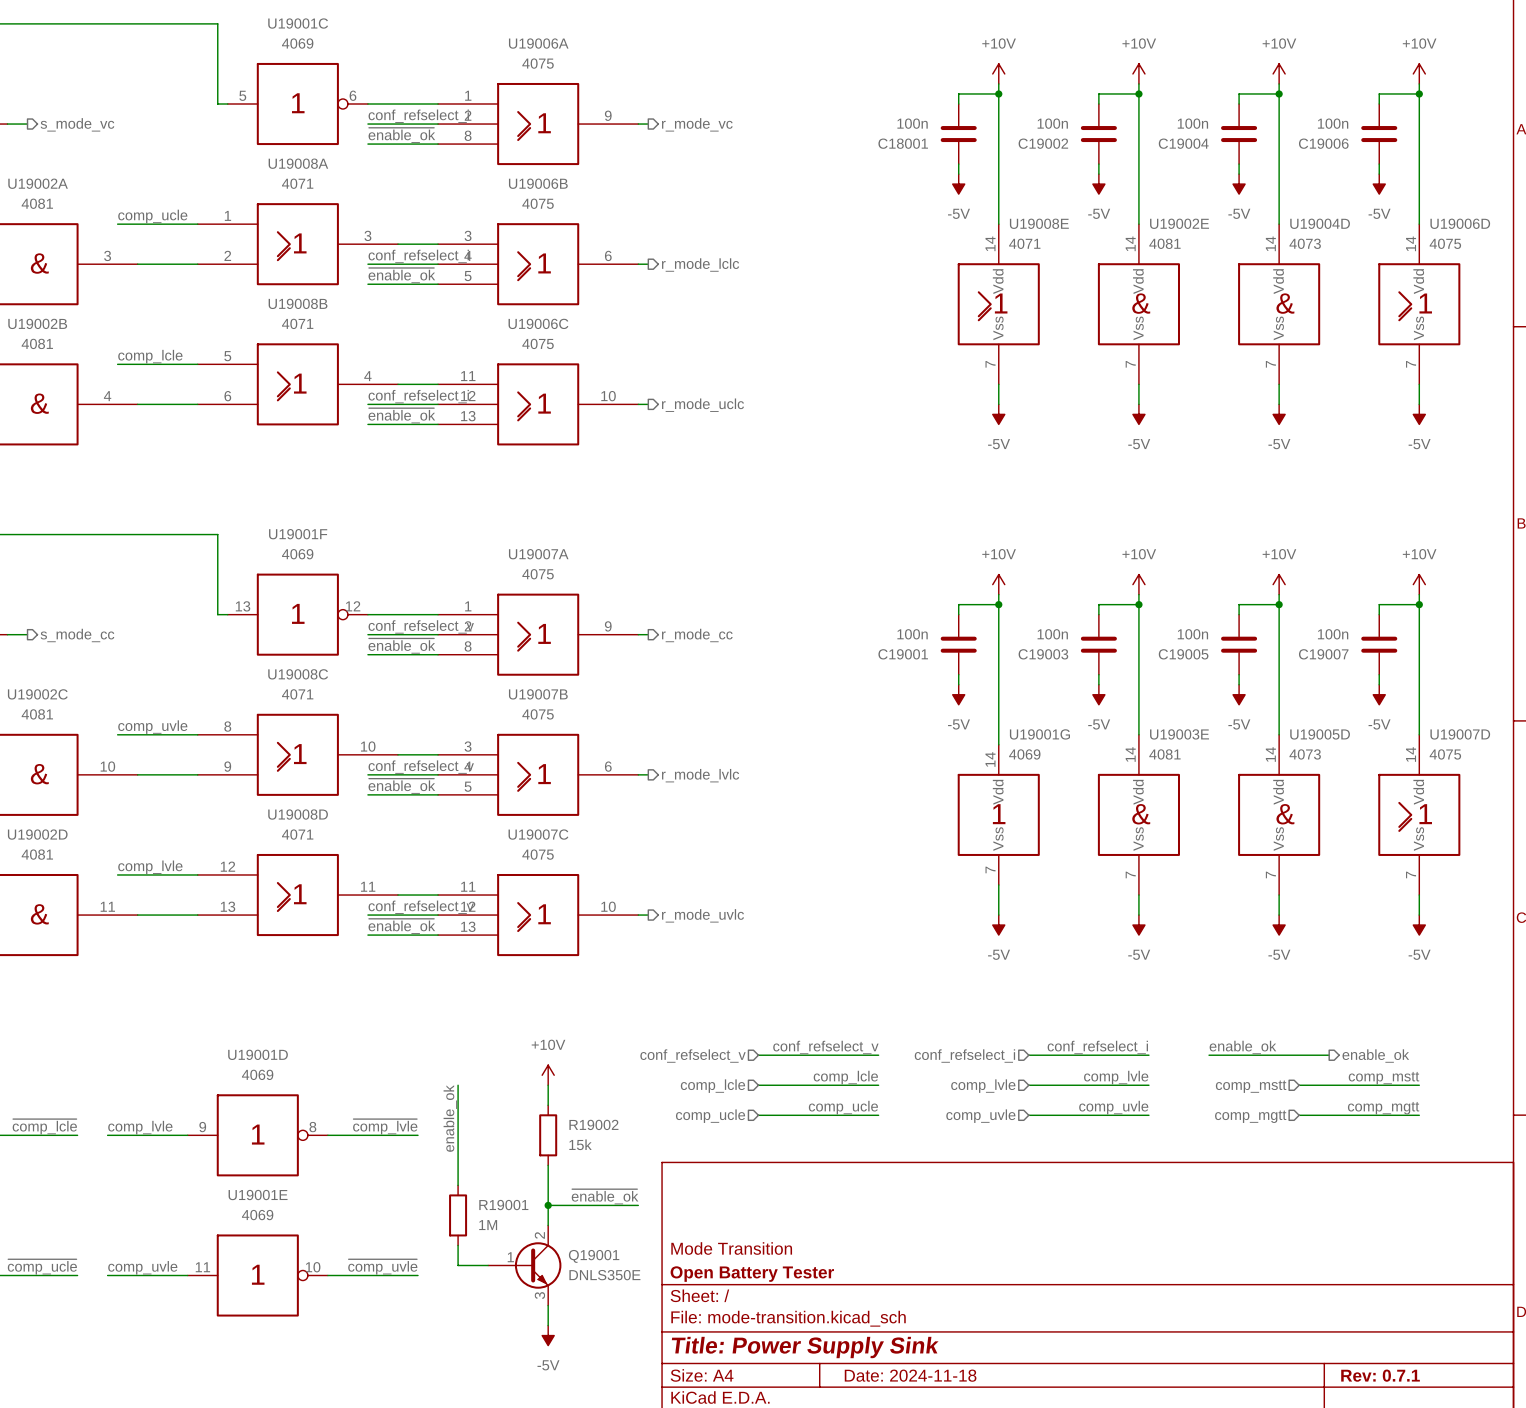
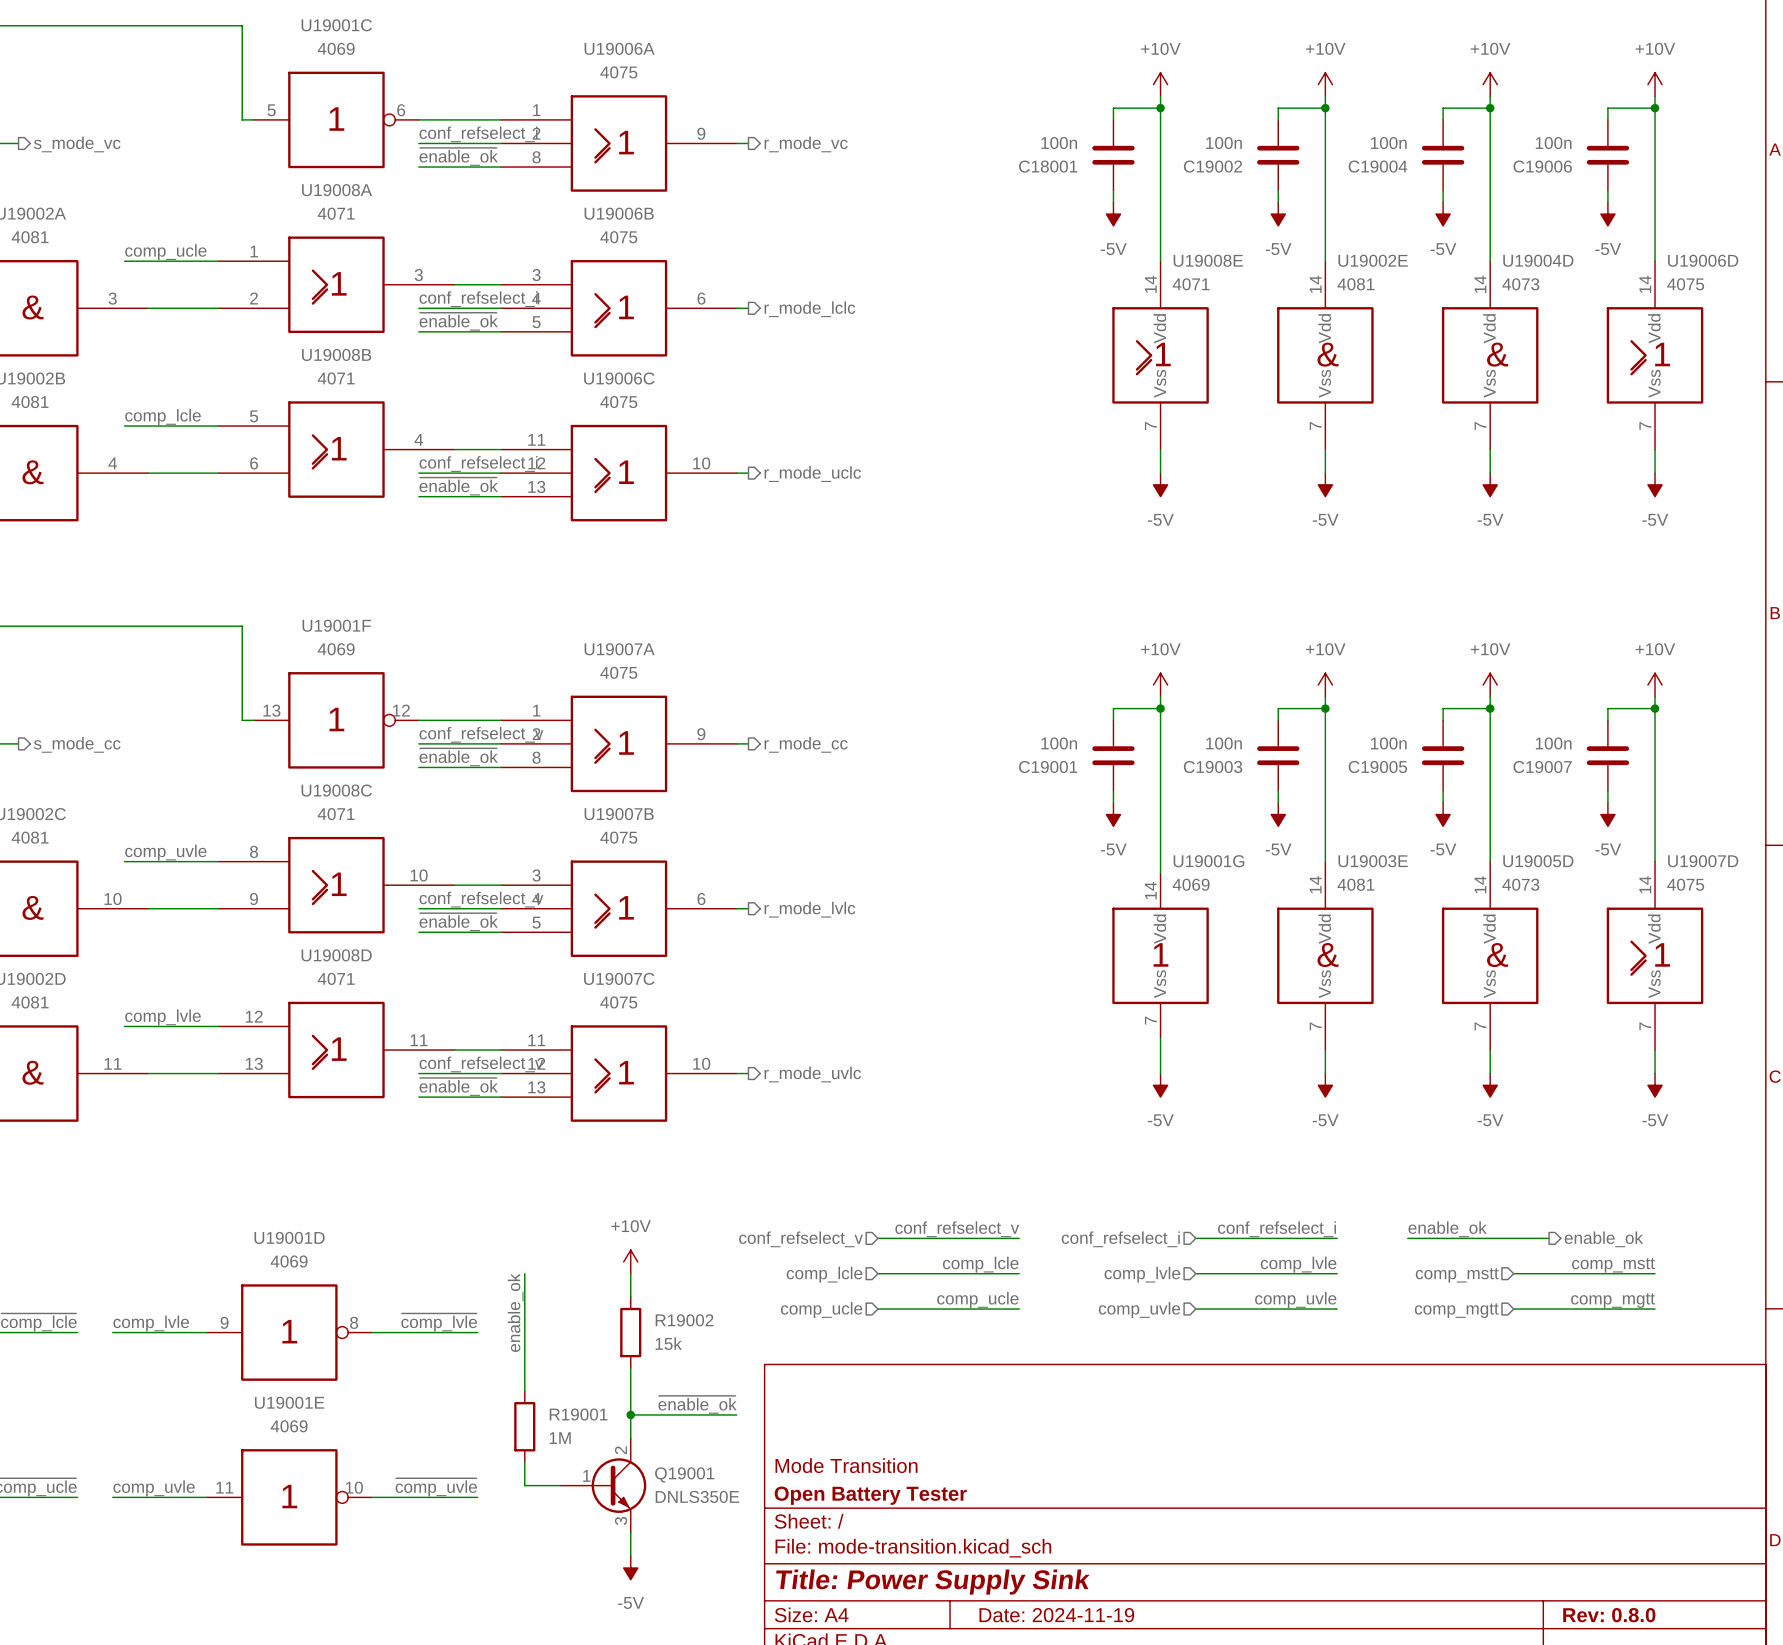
title block: Date: 2024-11-18 (910, 1375) -> Date: 2024-11-19 (1056, 1615)
title block: Rev: 0.7.1 (1380, 1375) -> Rev: 0.8.0 (1609, 1615)

